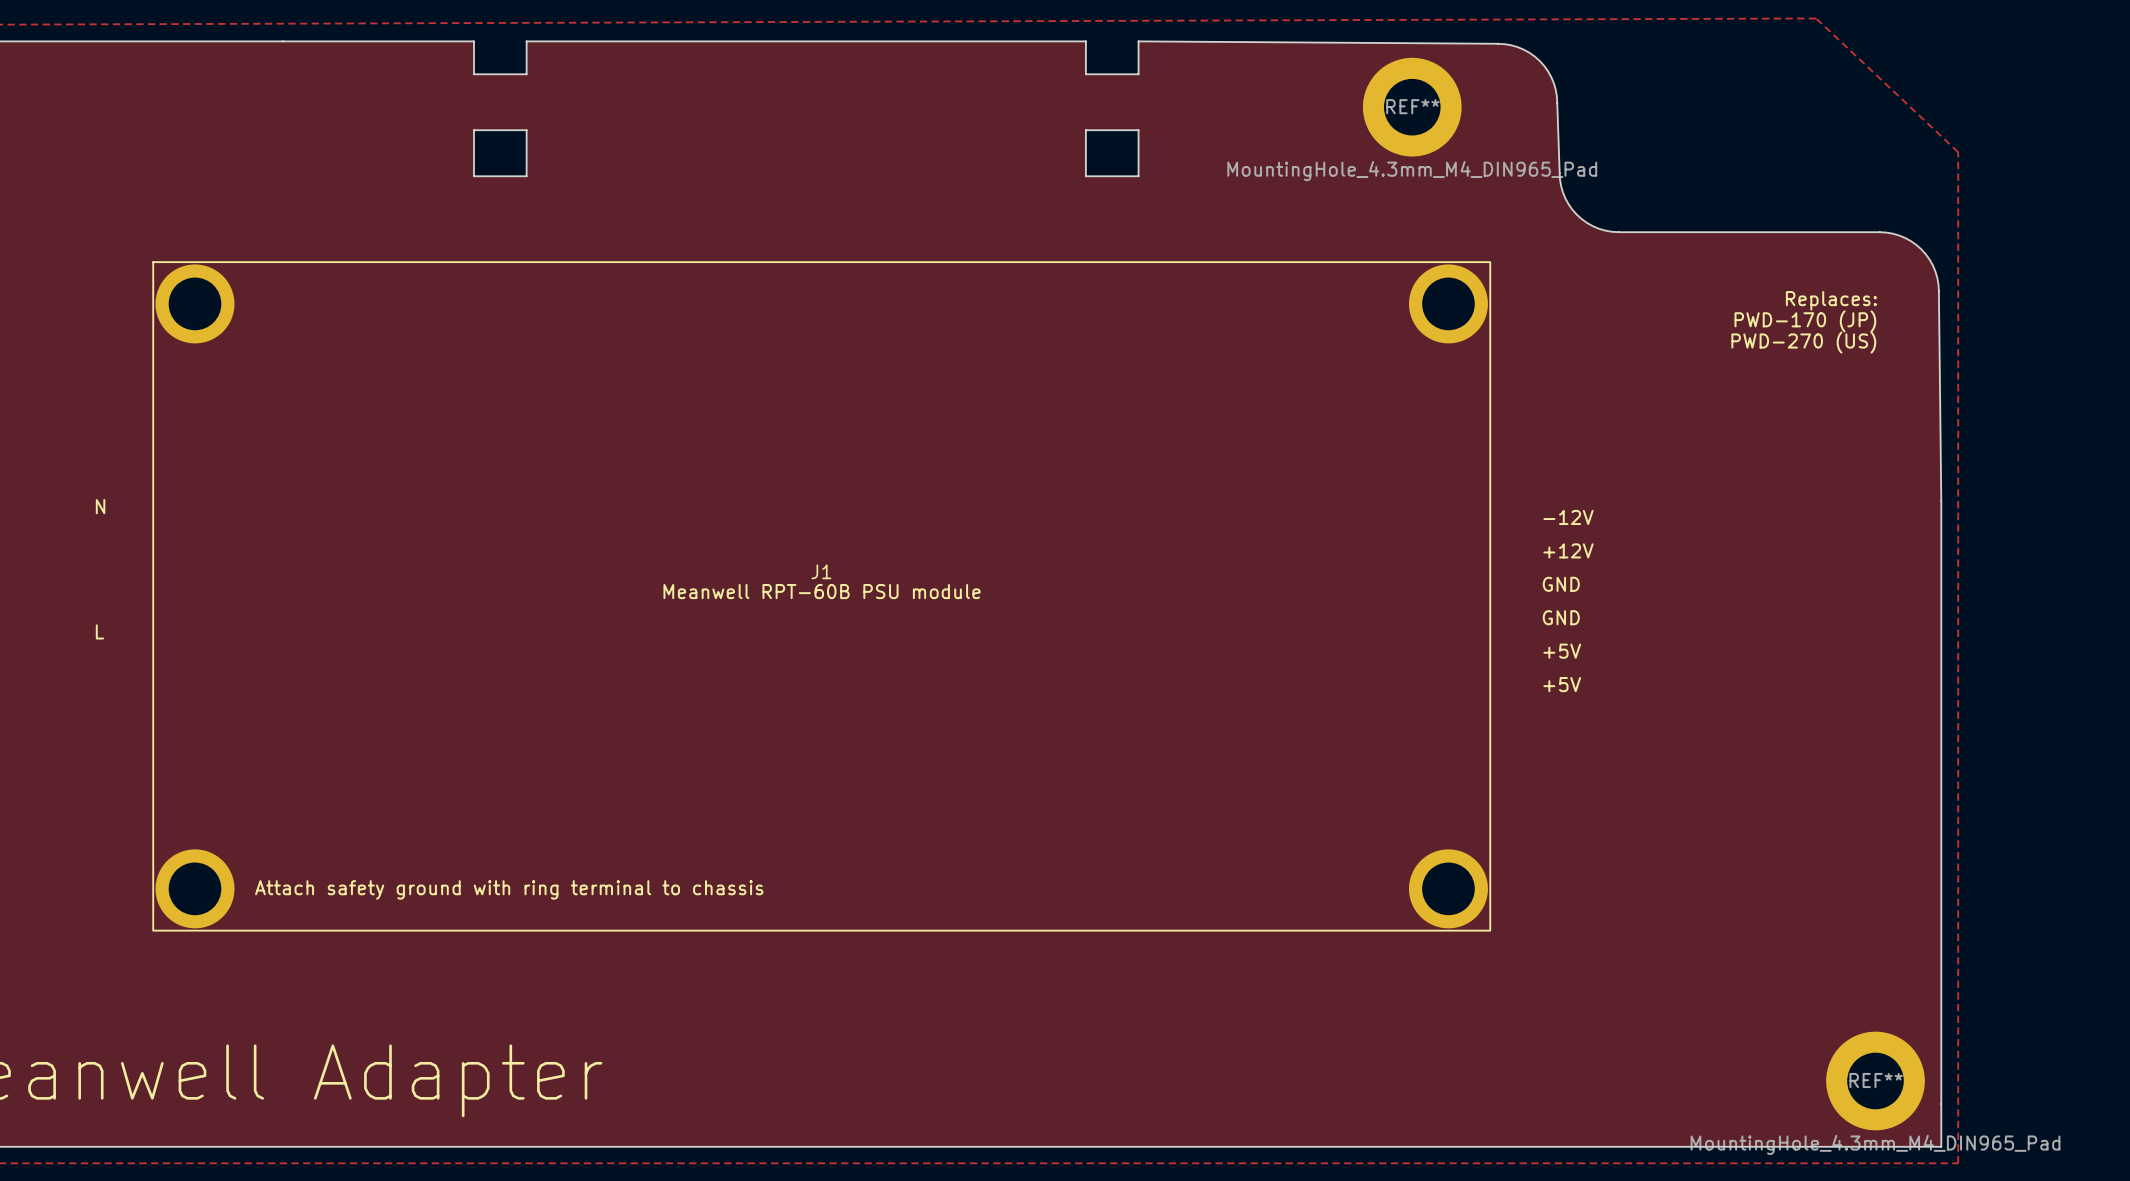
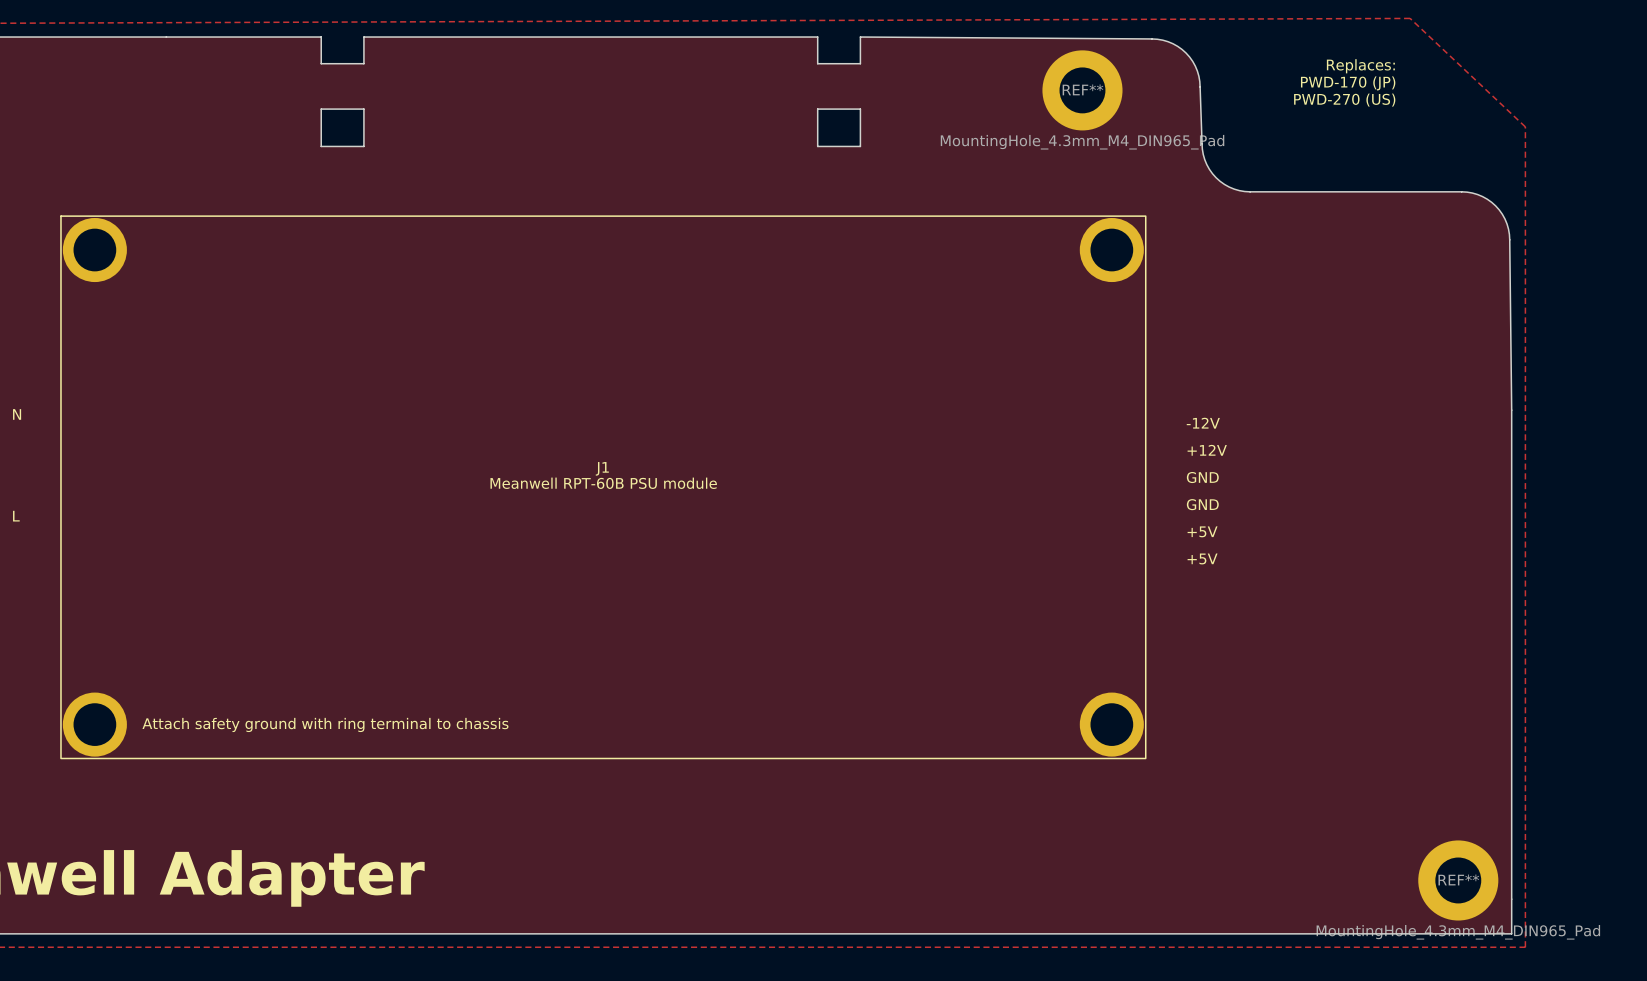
text position: Replaces: (1831, 300) -> Replaces: (1360, 66)
text position: PWD-170 (JP) (1805, 321) -> PWD-170 (JP) (1348, 83)
text position: PWD-270 (US) (1803, 342) -> PWD-270 (US) (1344, 100)

